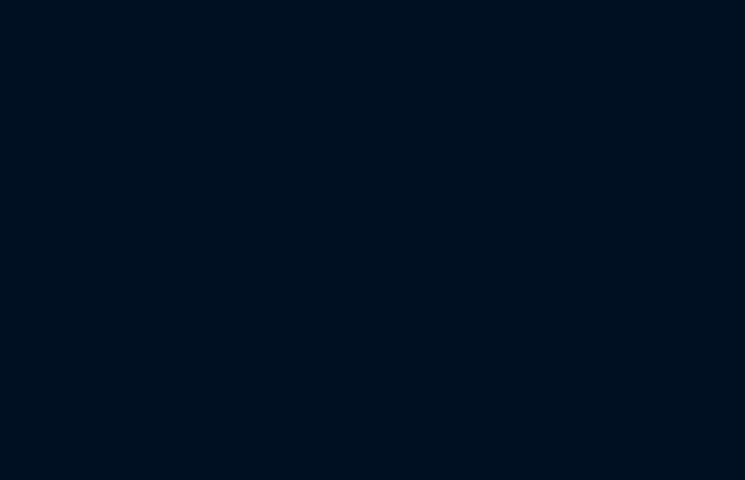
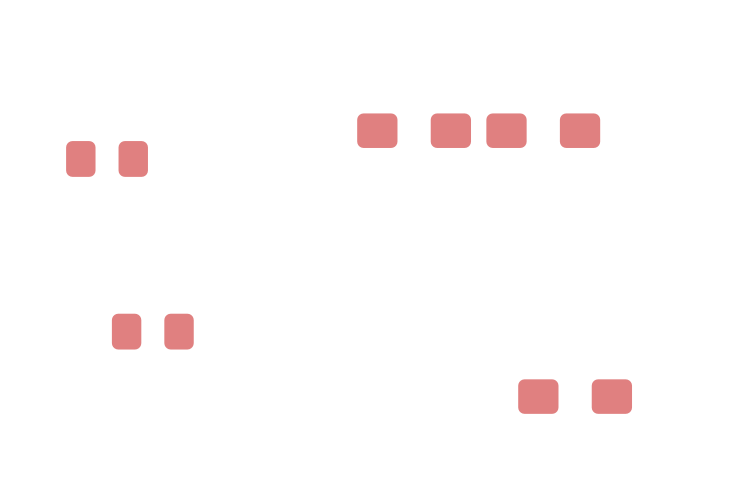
part: none -> (414, 130)
part: none -> (543, 130)
part: none -> (107, 158)
part: none -> (152, 331)
part: none -> (575, 396)

